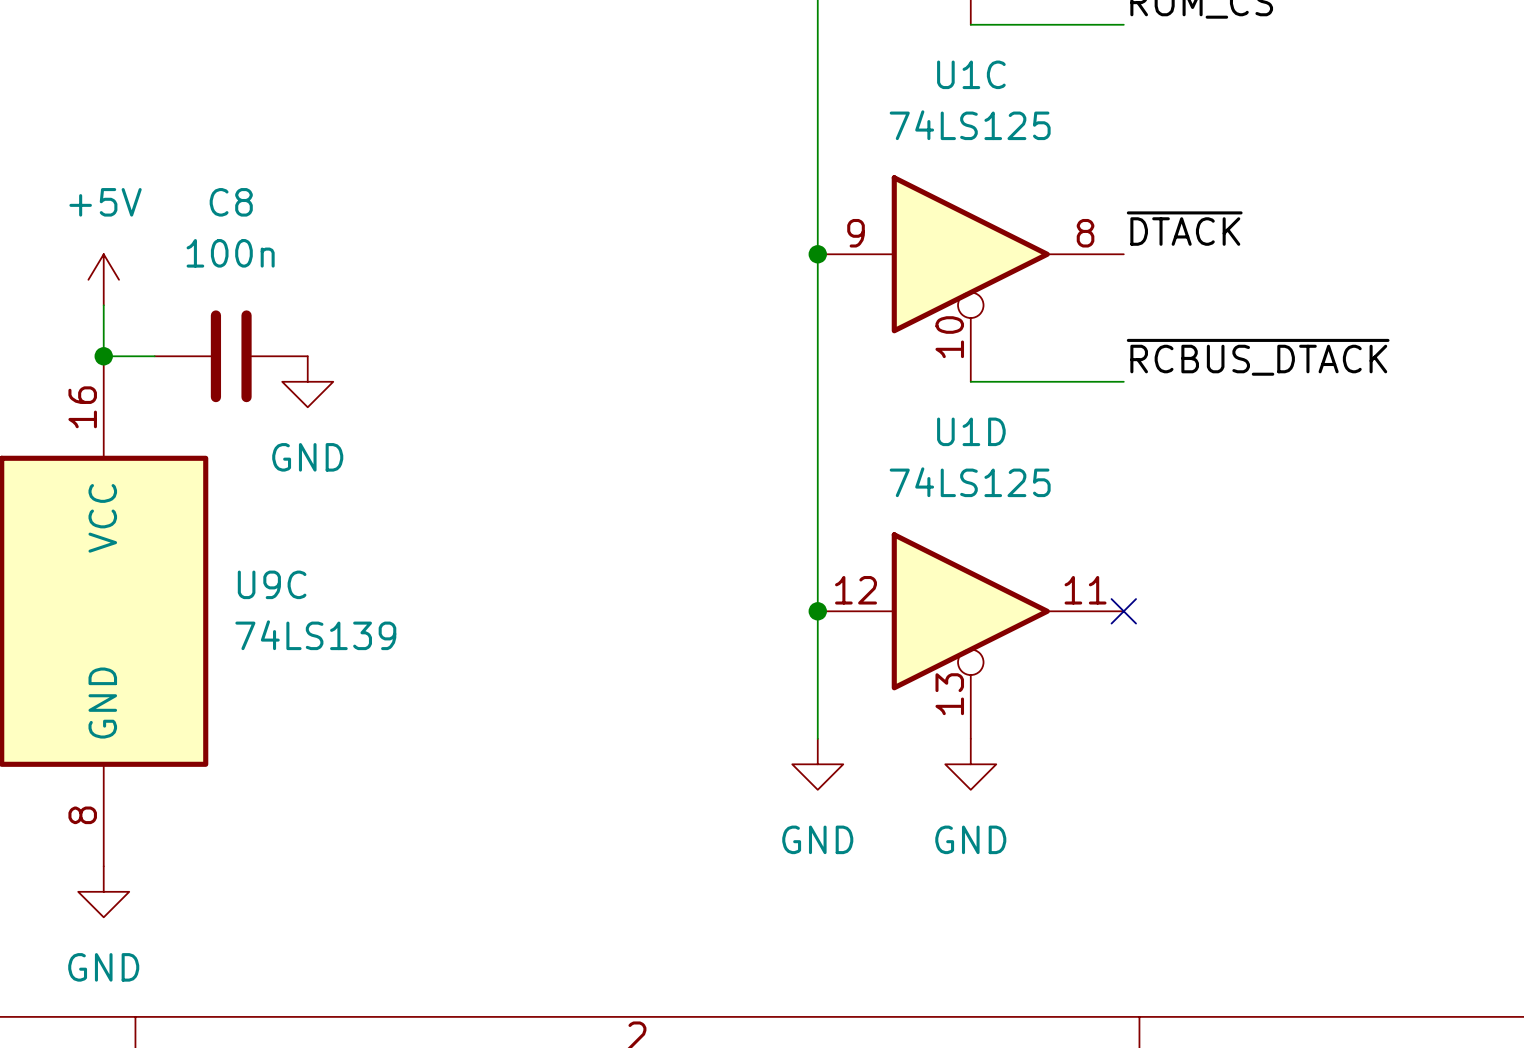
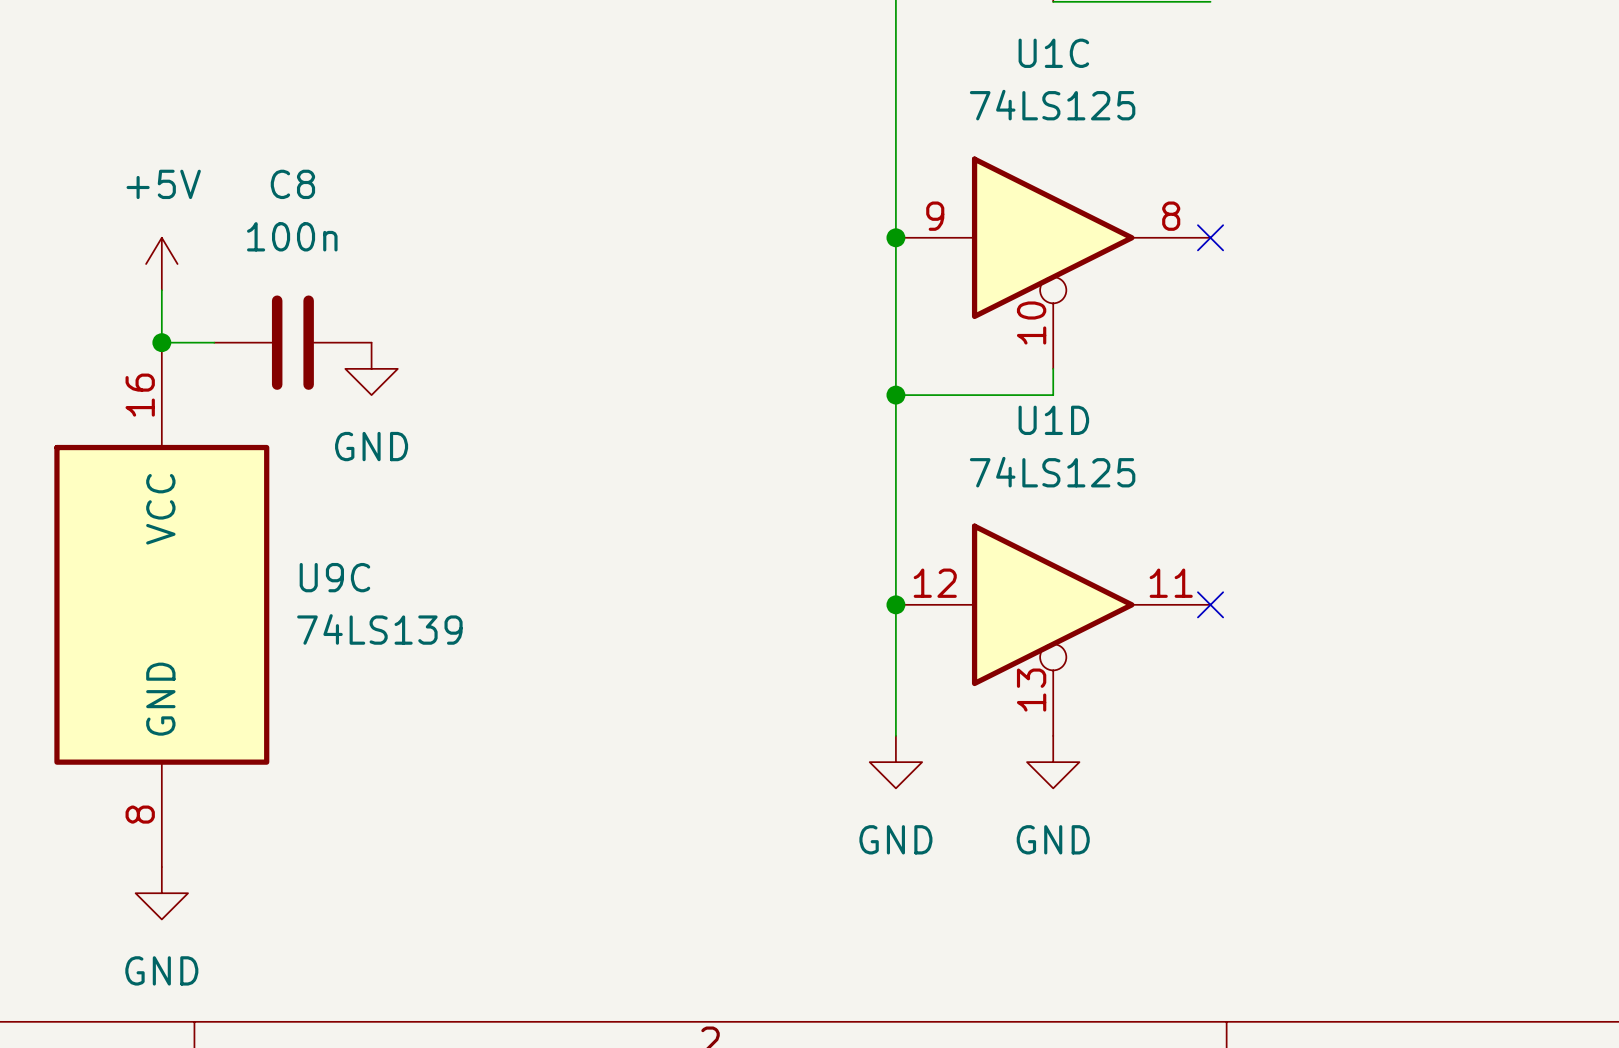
label: ~{DTACK} (1184, 228) -> none
no-connect mark: none -> (1210, 237)
label: ~{RCBUS_DTACK} (1258, 357) -> none
wire: (970, 381) (1123, 381) -> (1053, 368) (1053, 395) (895, 395)
junction: none -> (895, 395)

